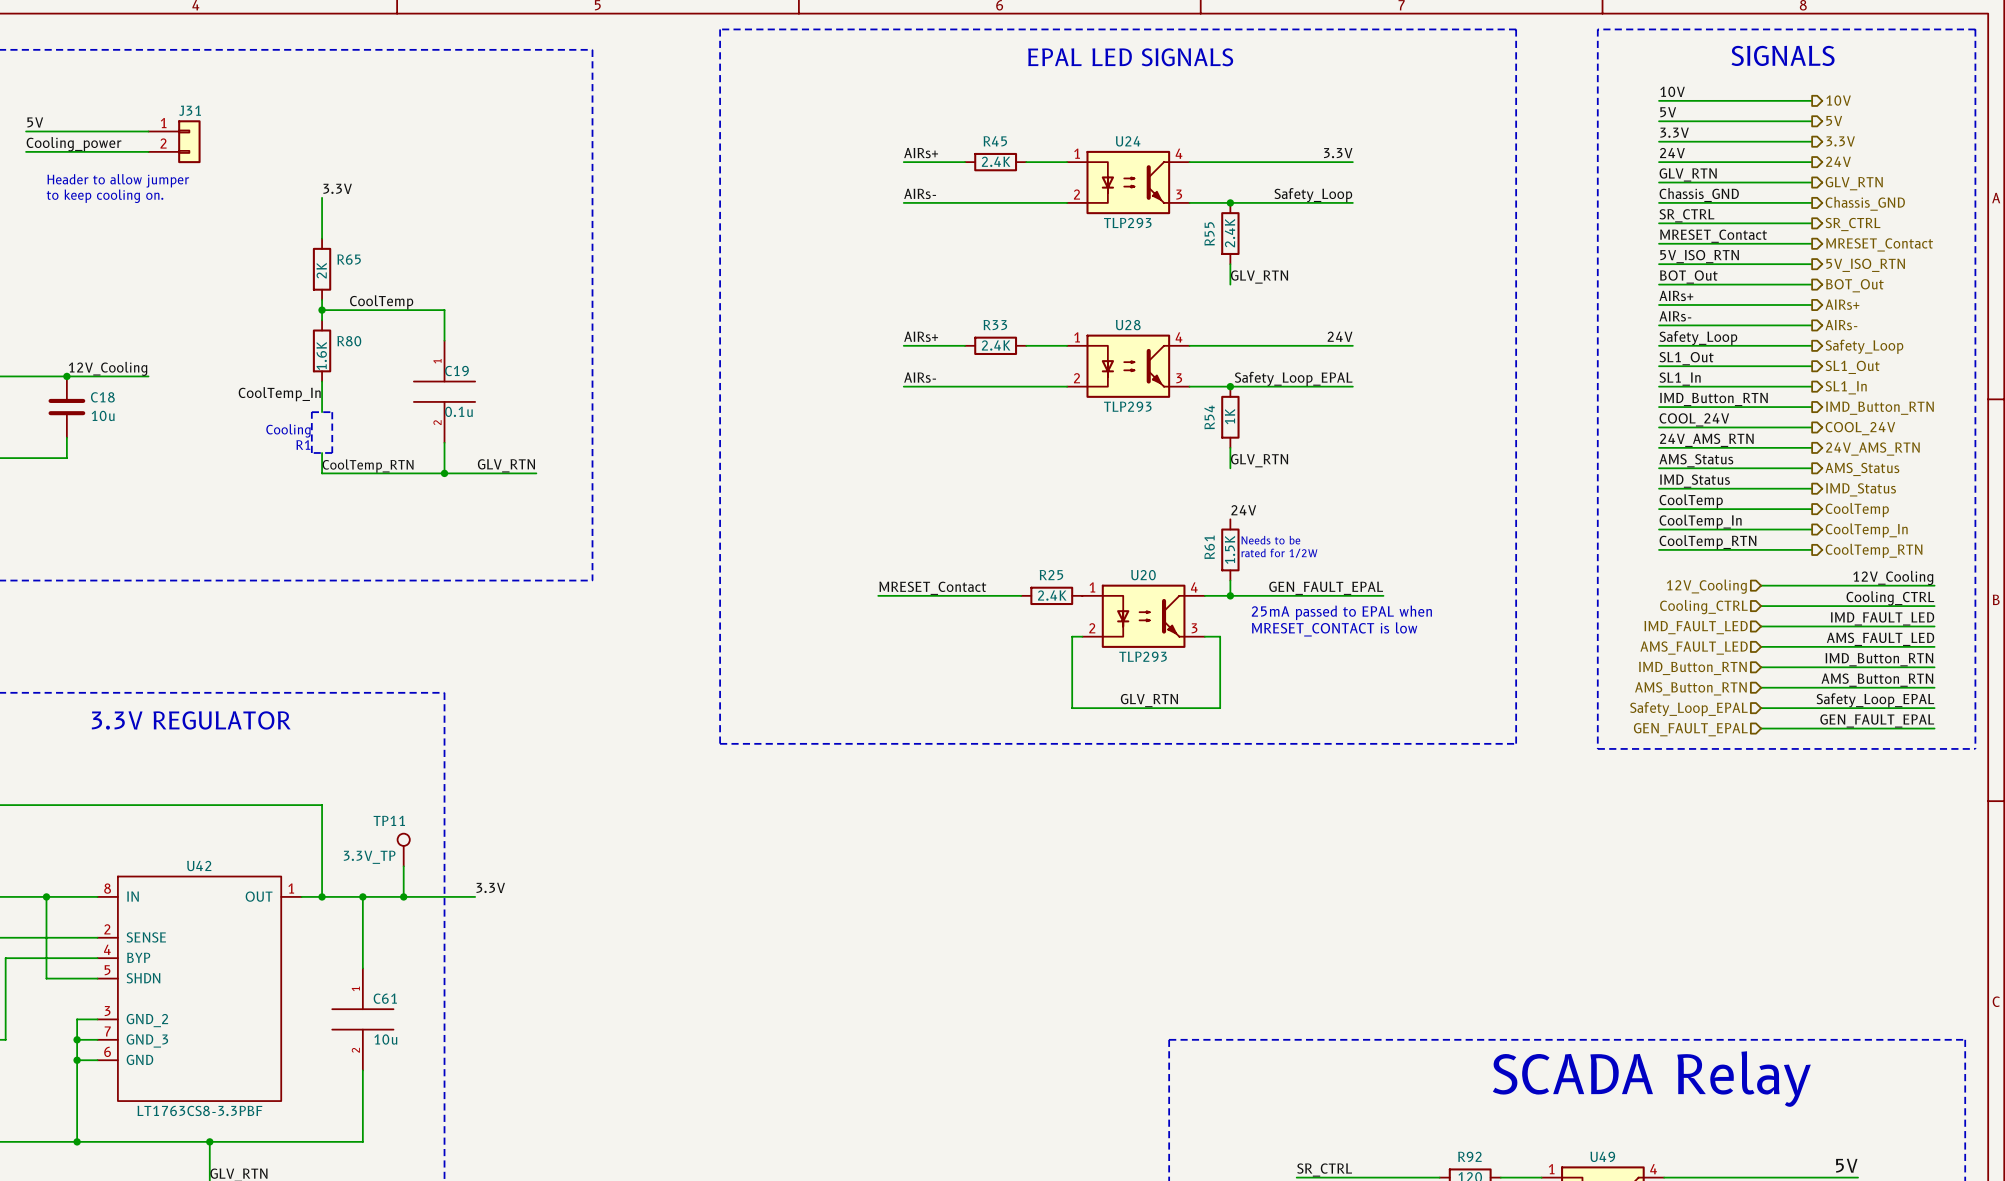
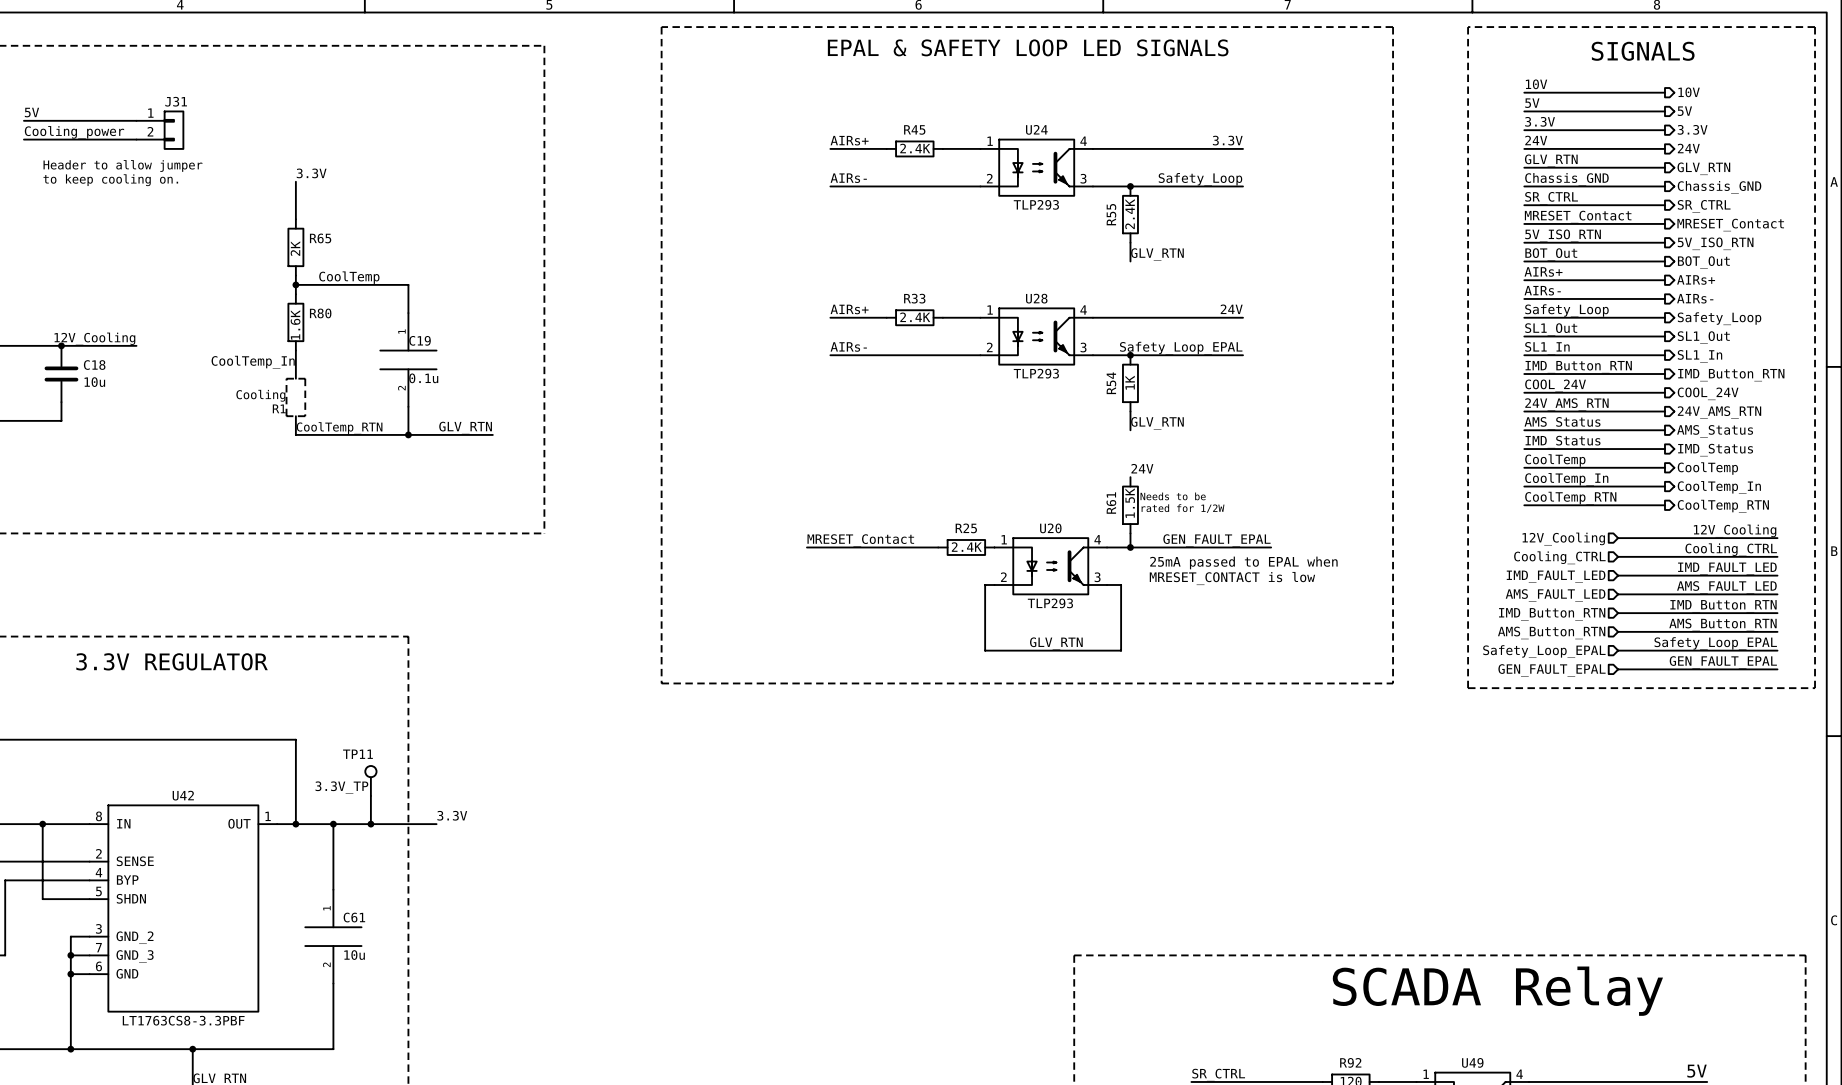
text: EPAL LED SIGNALS (1130, 57) -> EPAL & SAFETY LOOP LED SIGNALS (1028, 47)

